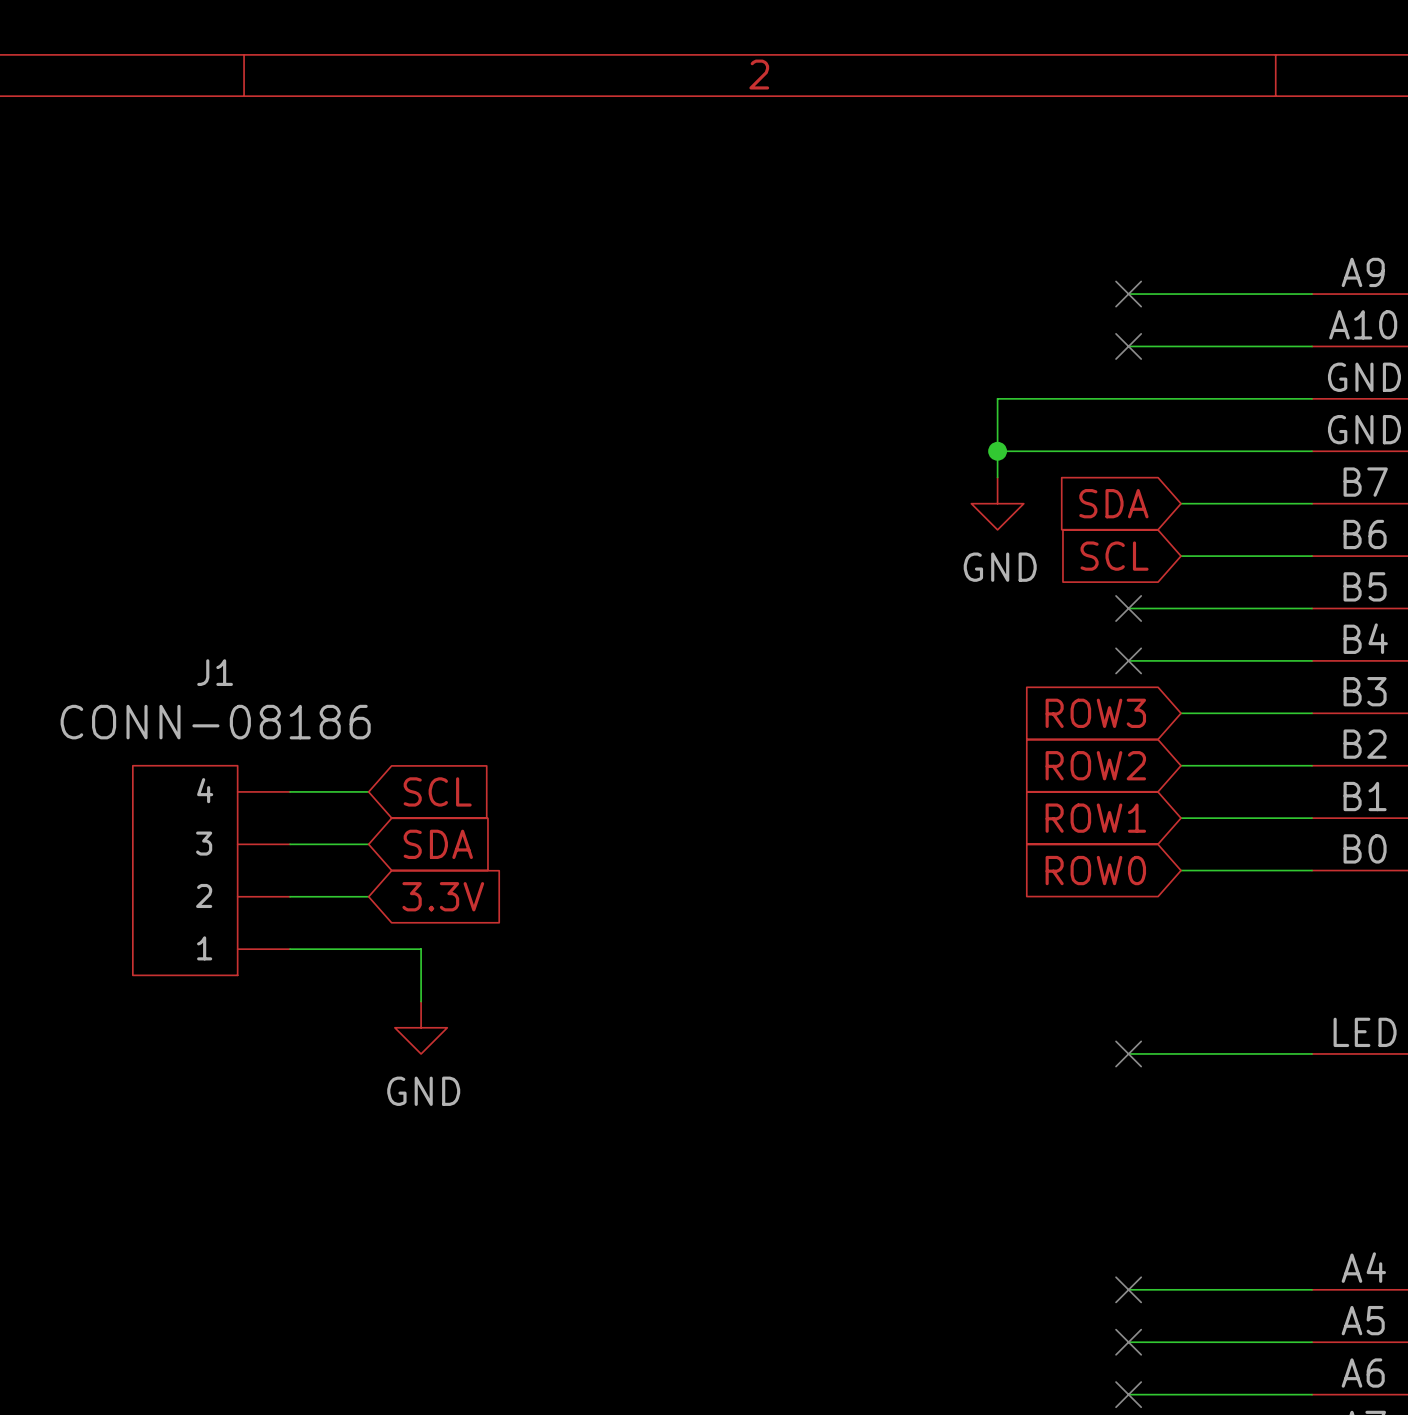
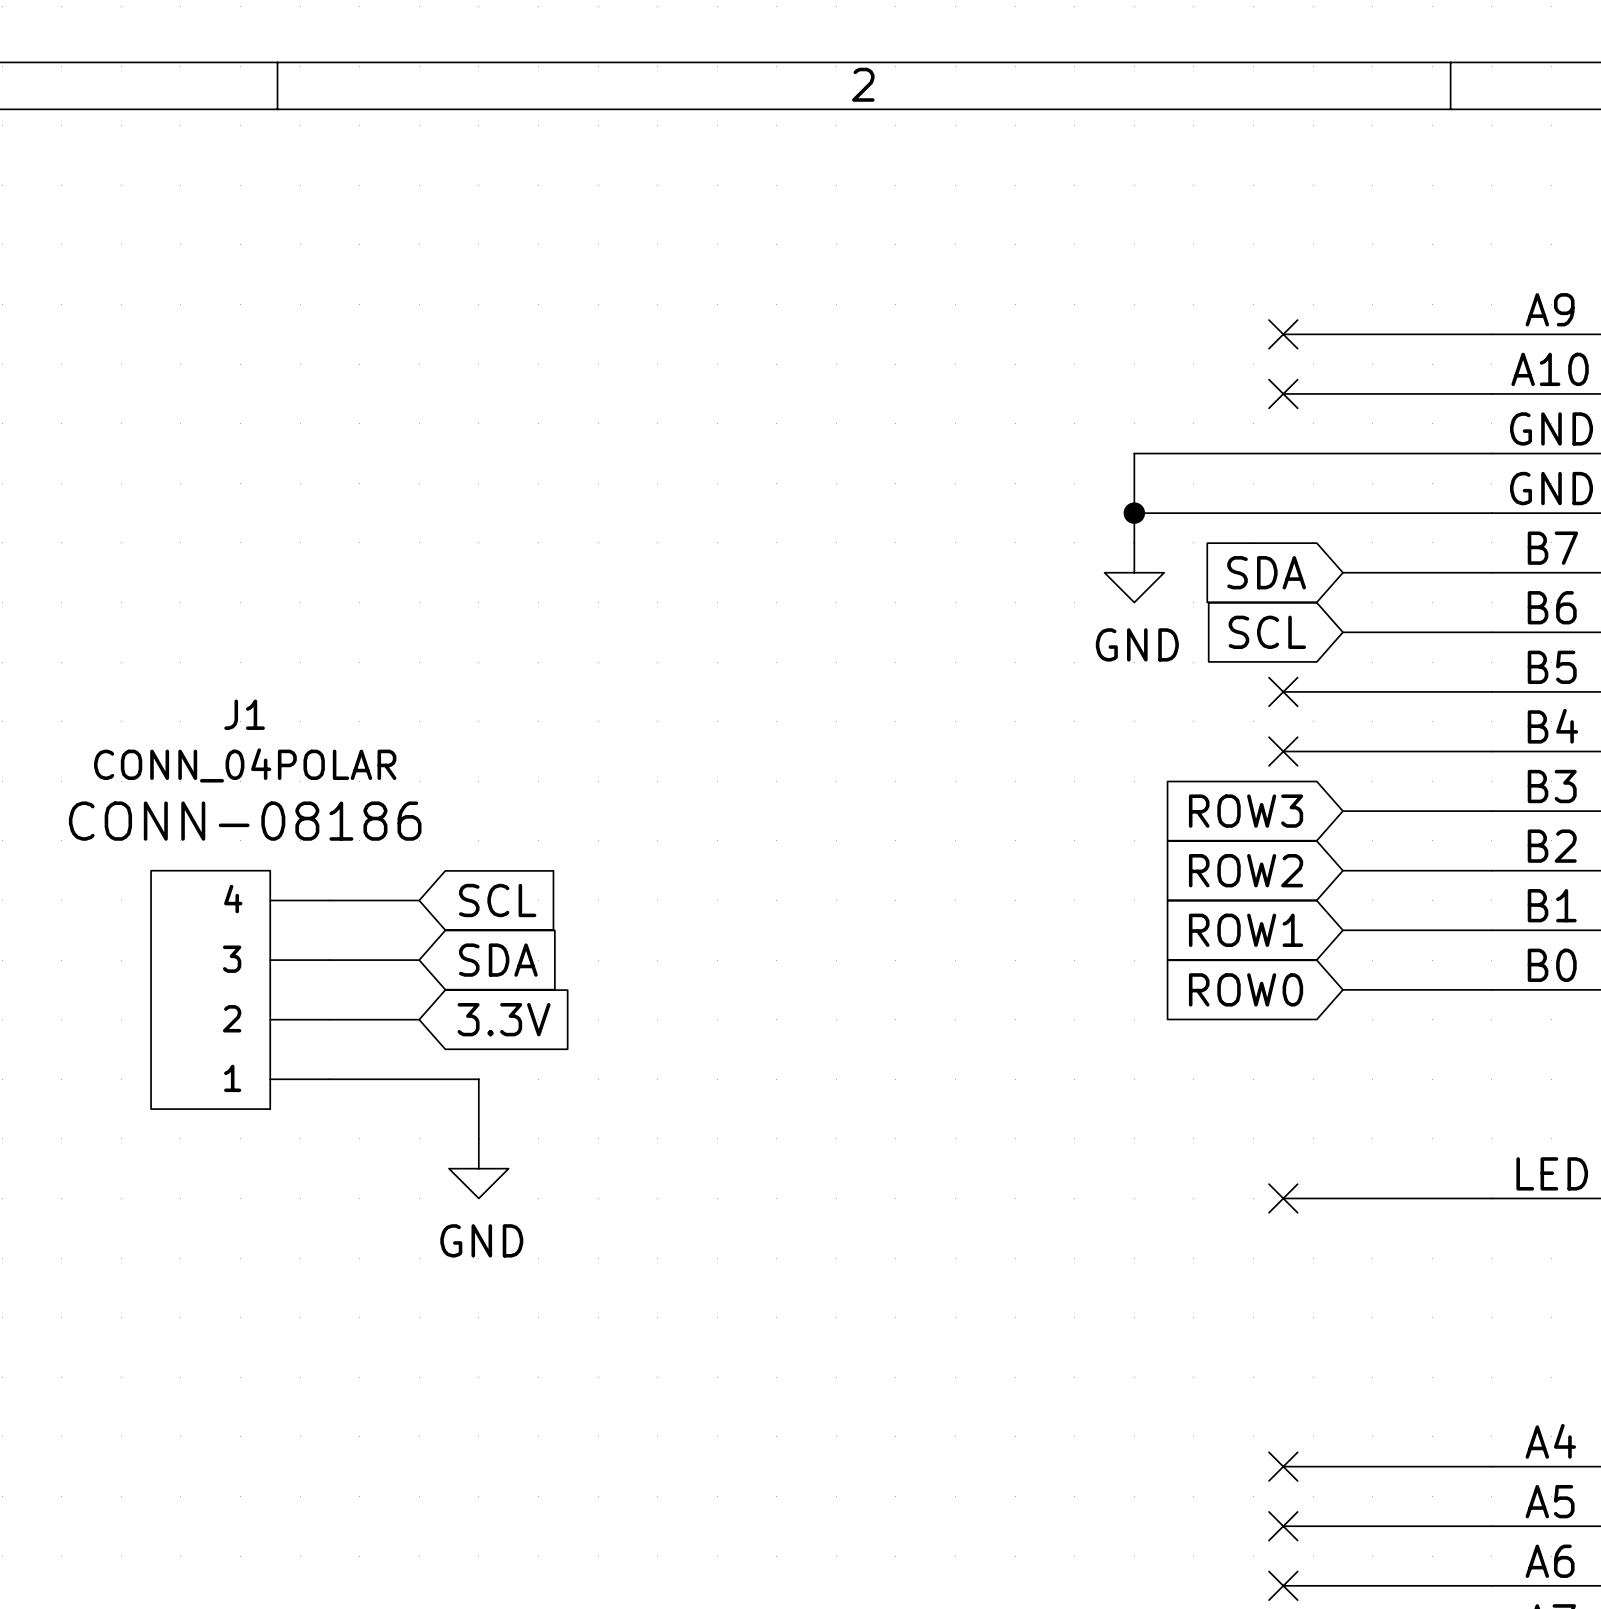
J1 name position: J1 (215, 672) -> J1 (244, 714)
J1 value: none -> CONN_04POLAR (245, 765)

